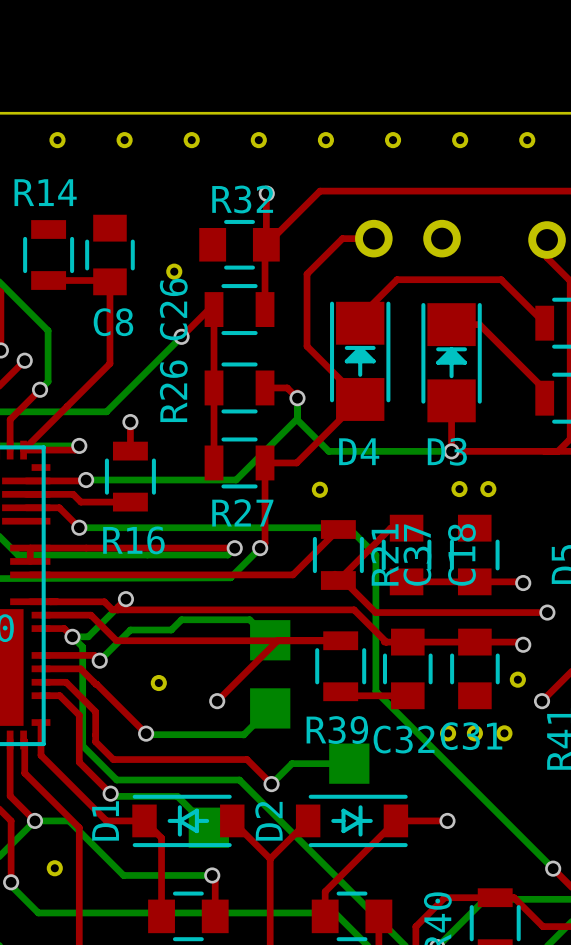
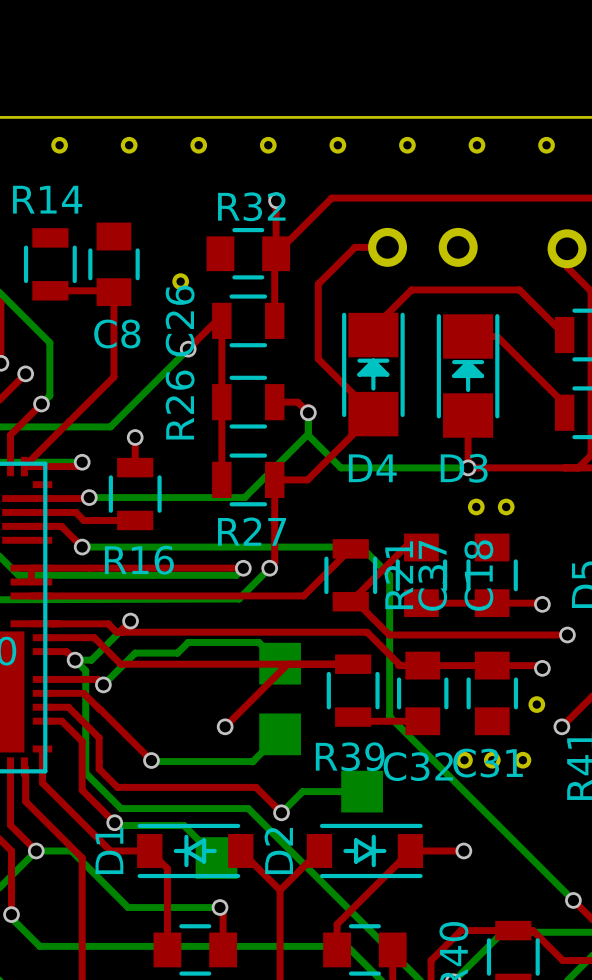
part: (319, 489) -> none
part: (158, 683) -> none
part: (54, 868) -> none

